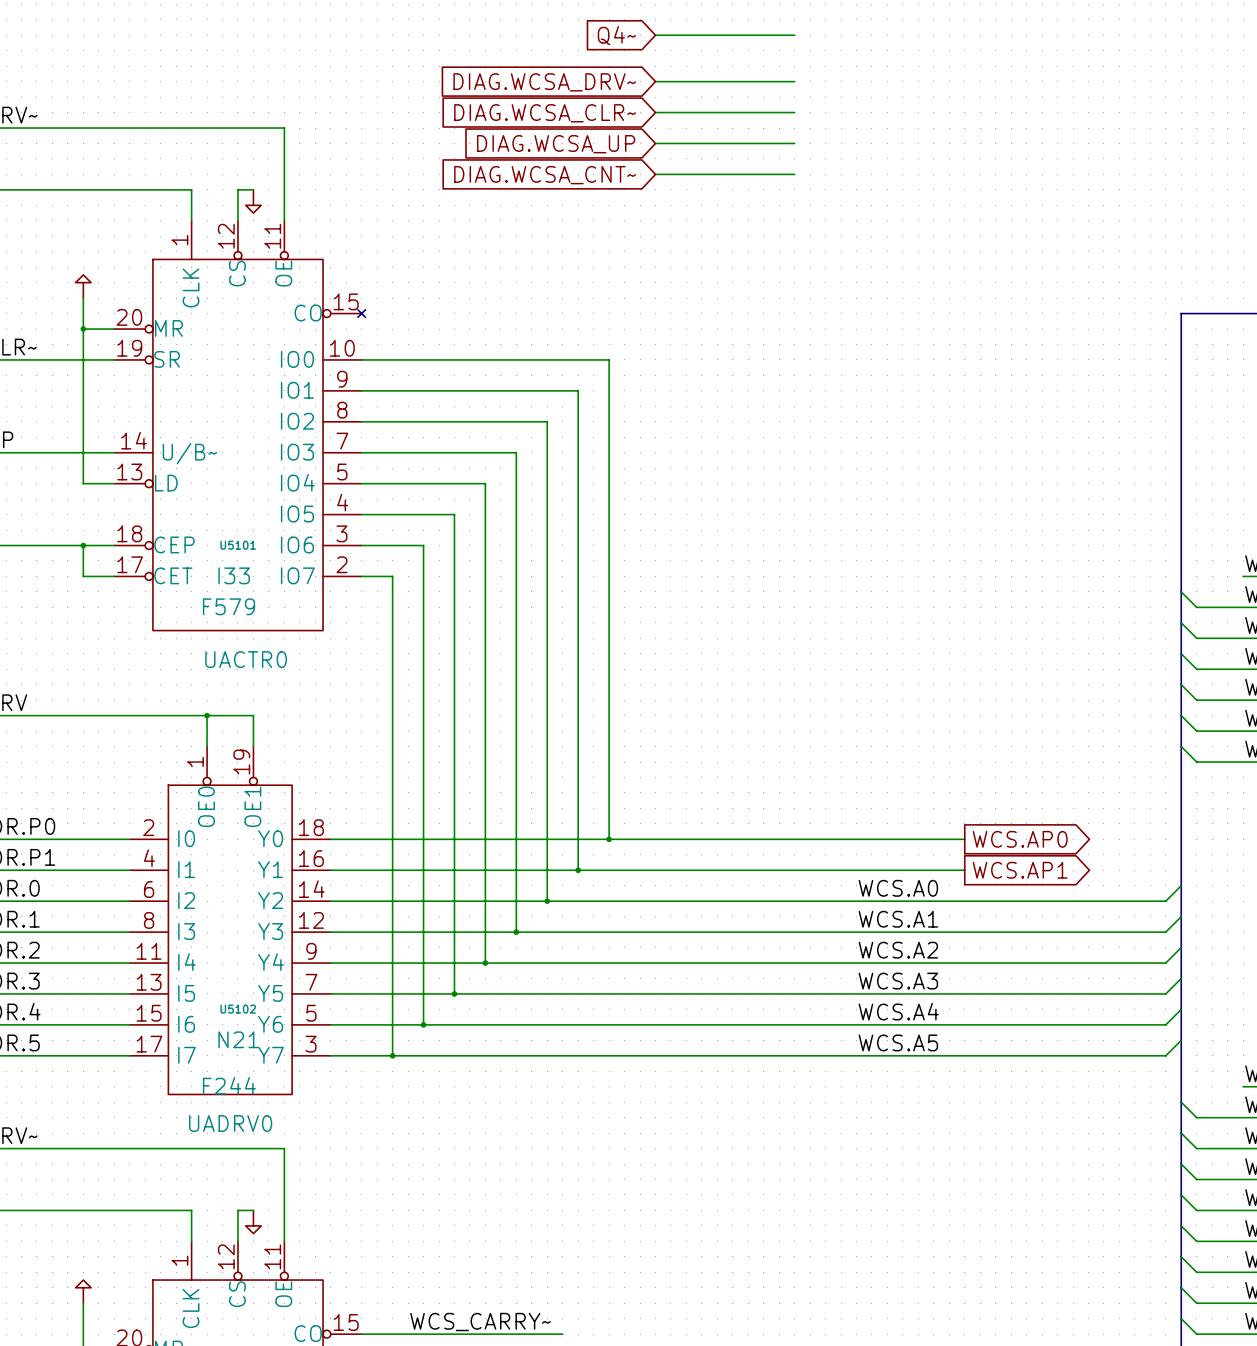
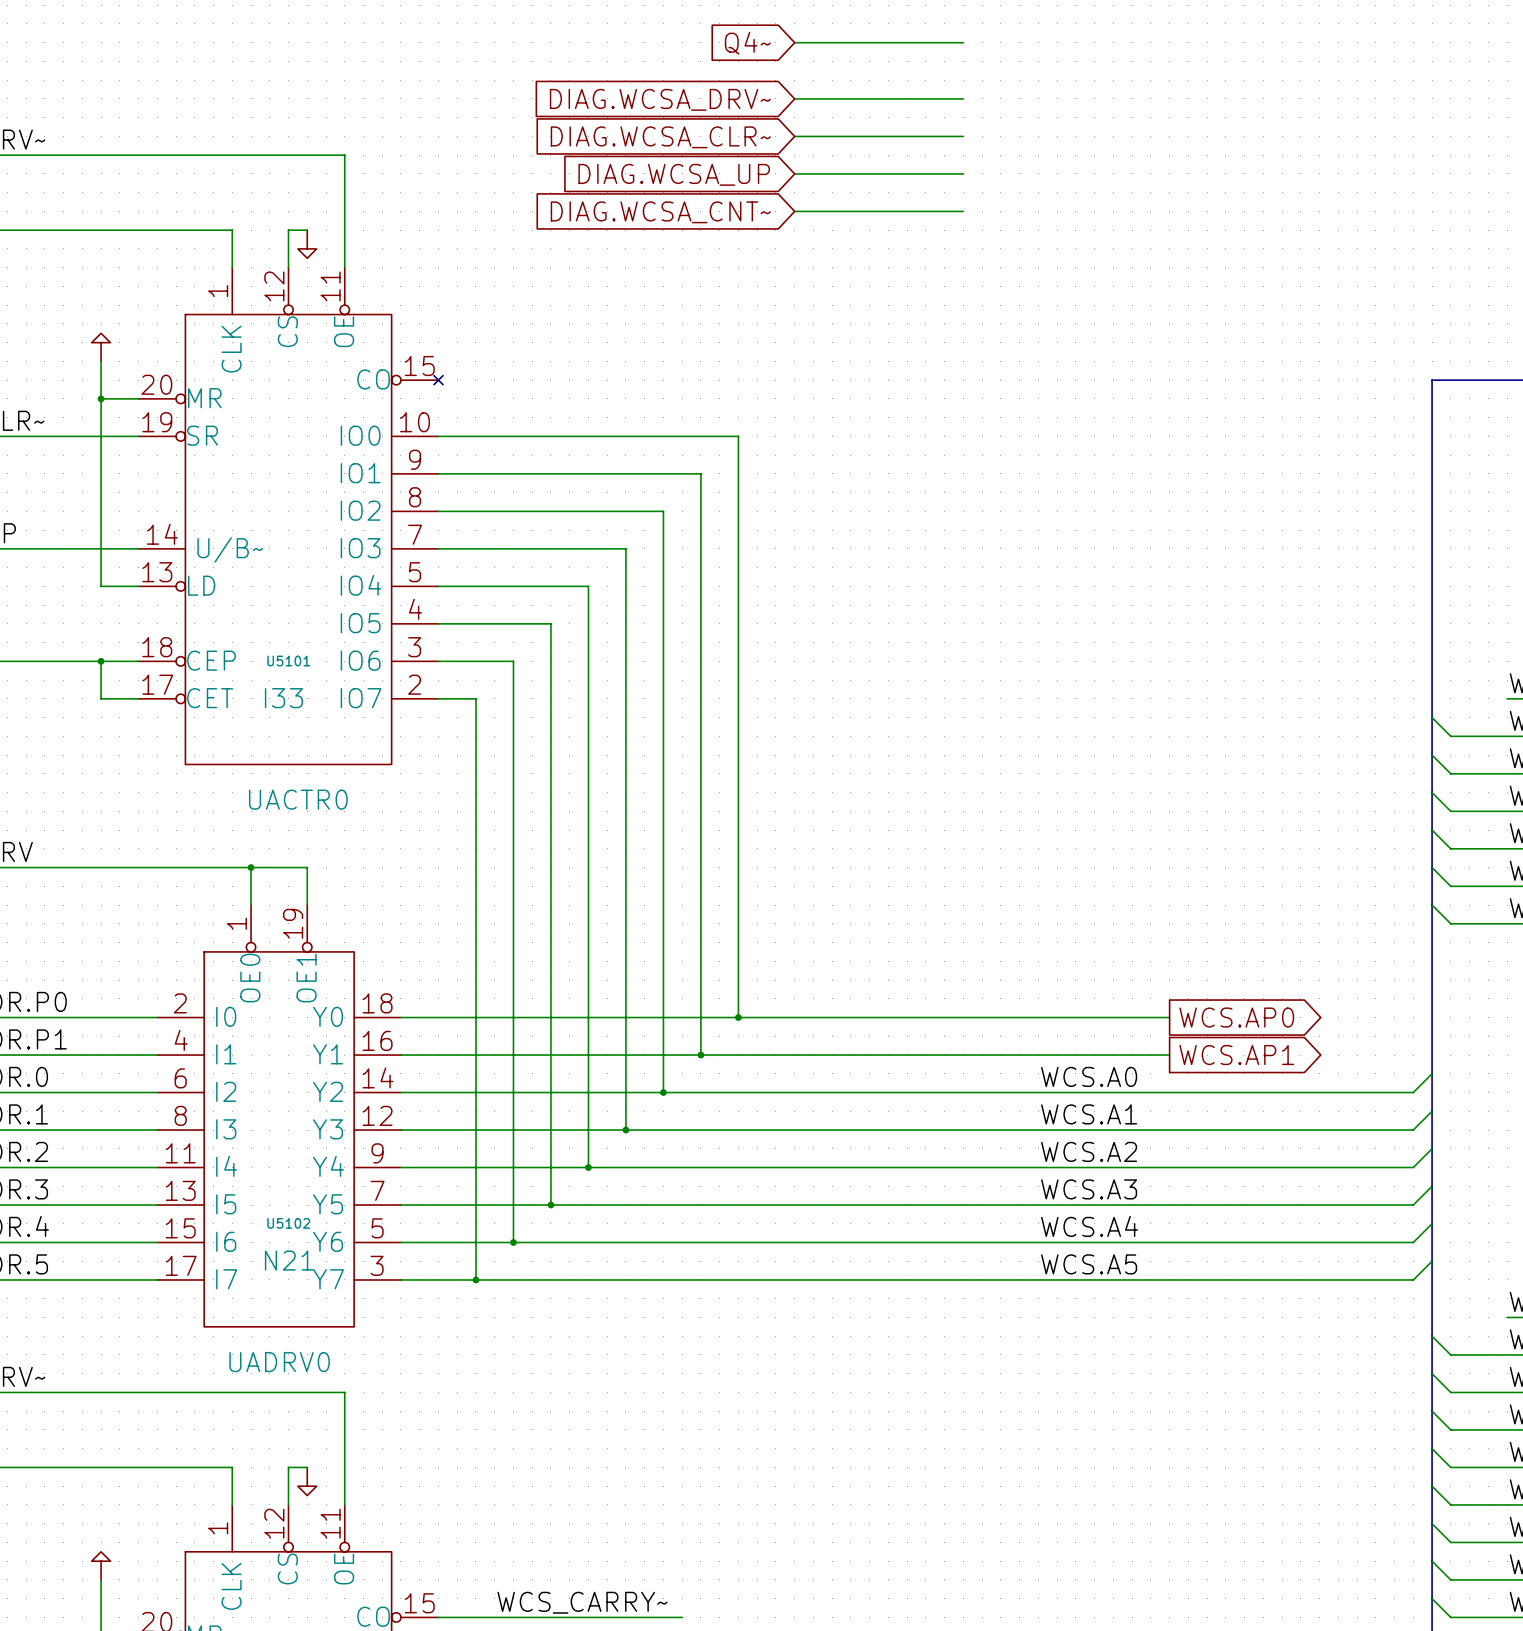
U5101 value: F579 (229, 606) -> none
U5102 value: F244 (229, 1085) -> none

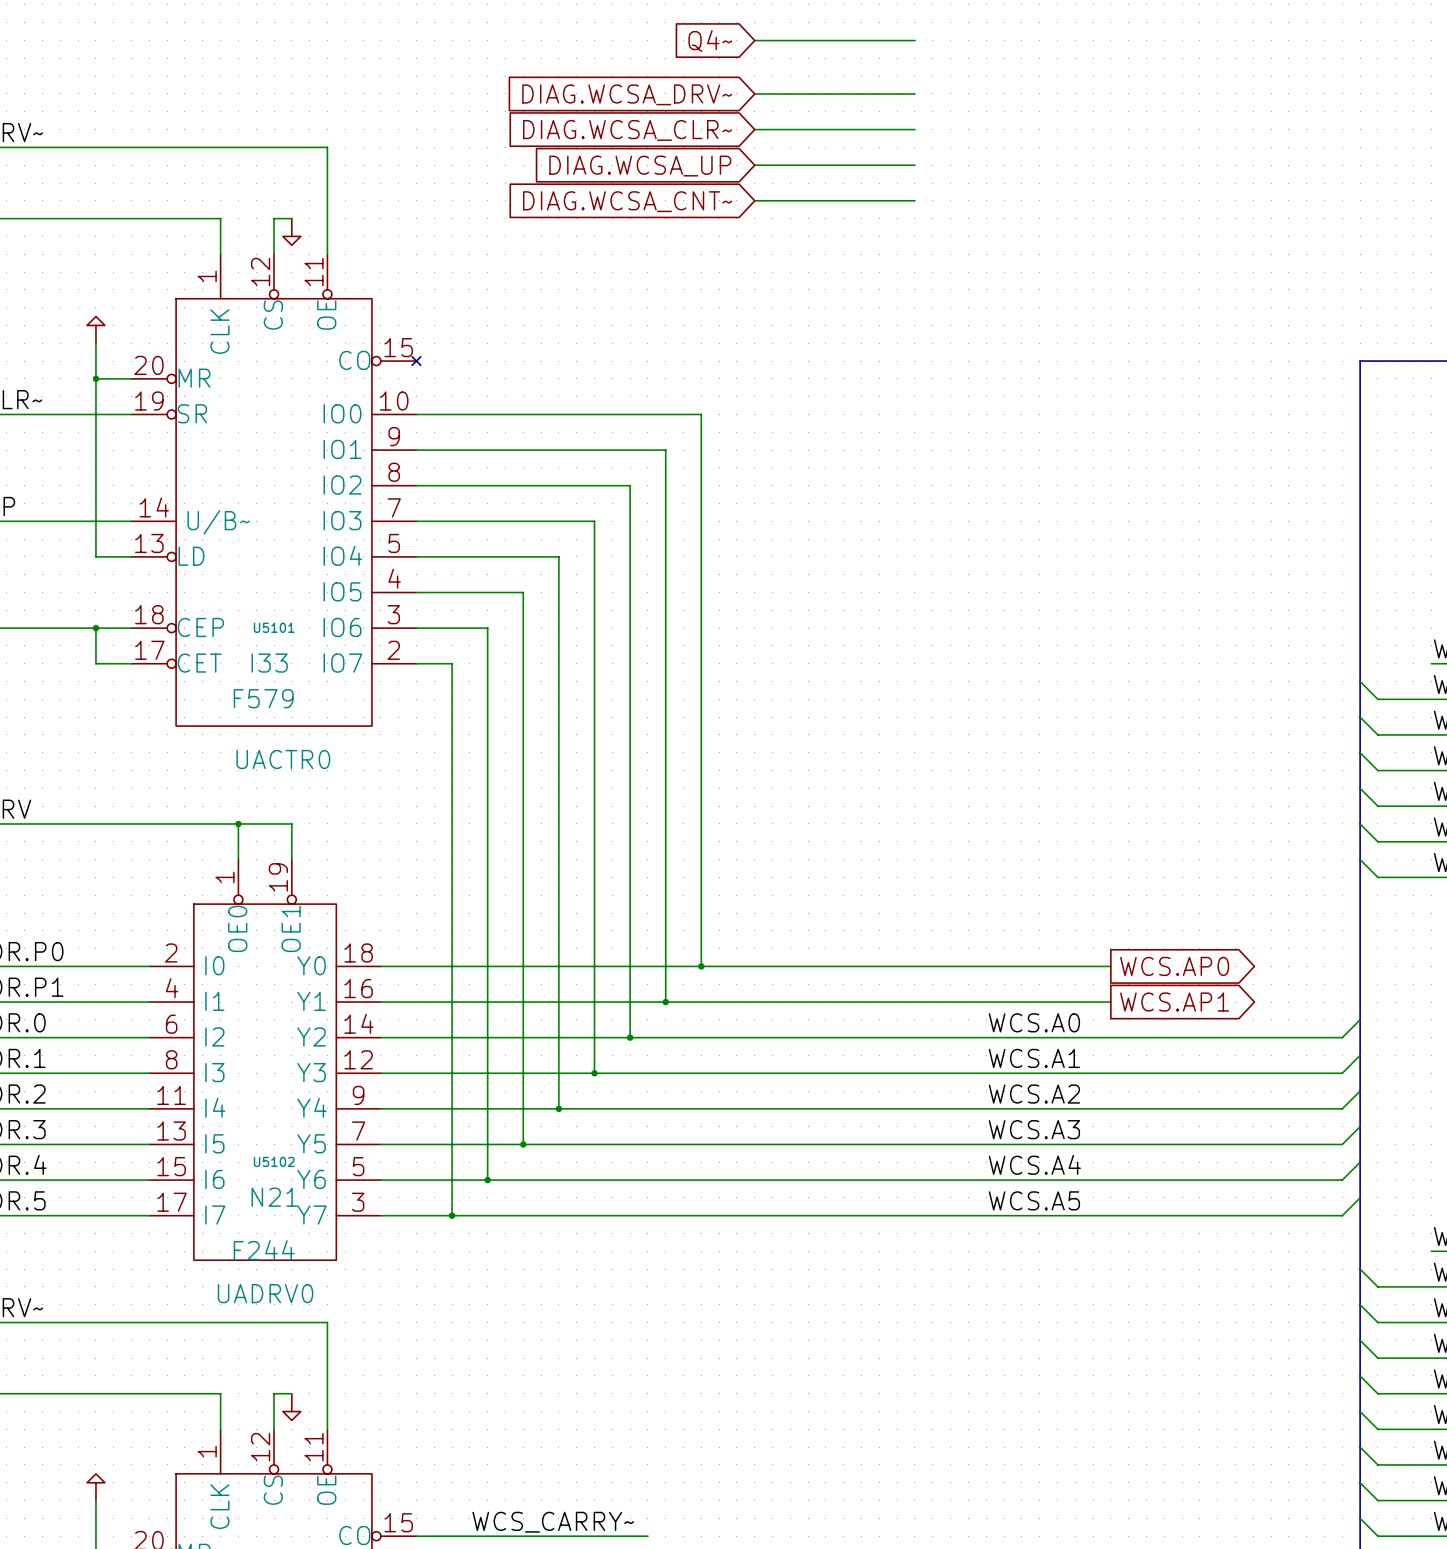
U5101 value: none -> F579 (263, 698)
U5102 value: none -> F244 (264, 1250)

